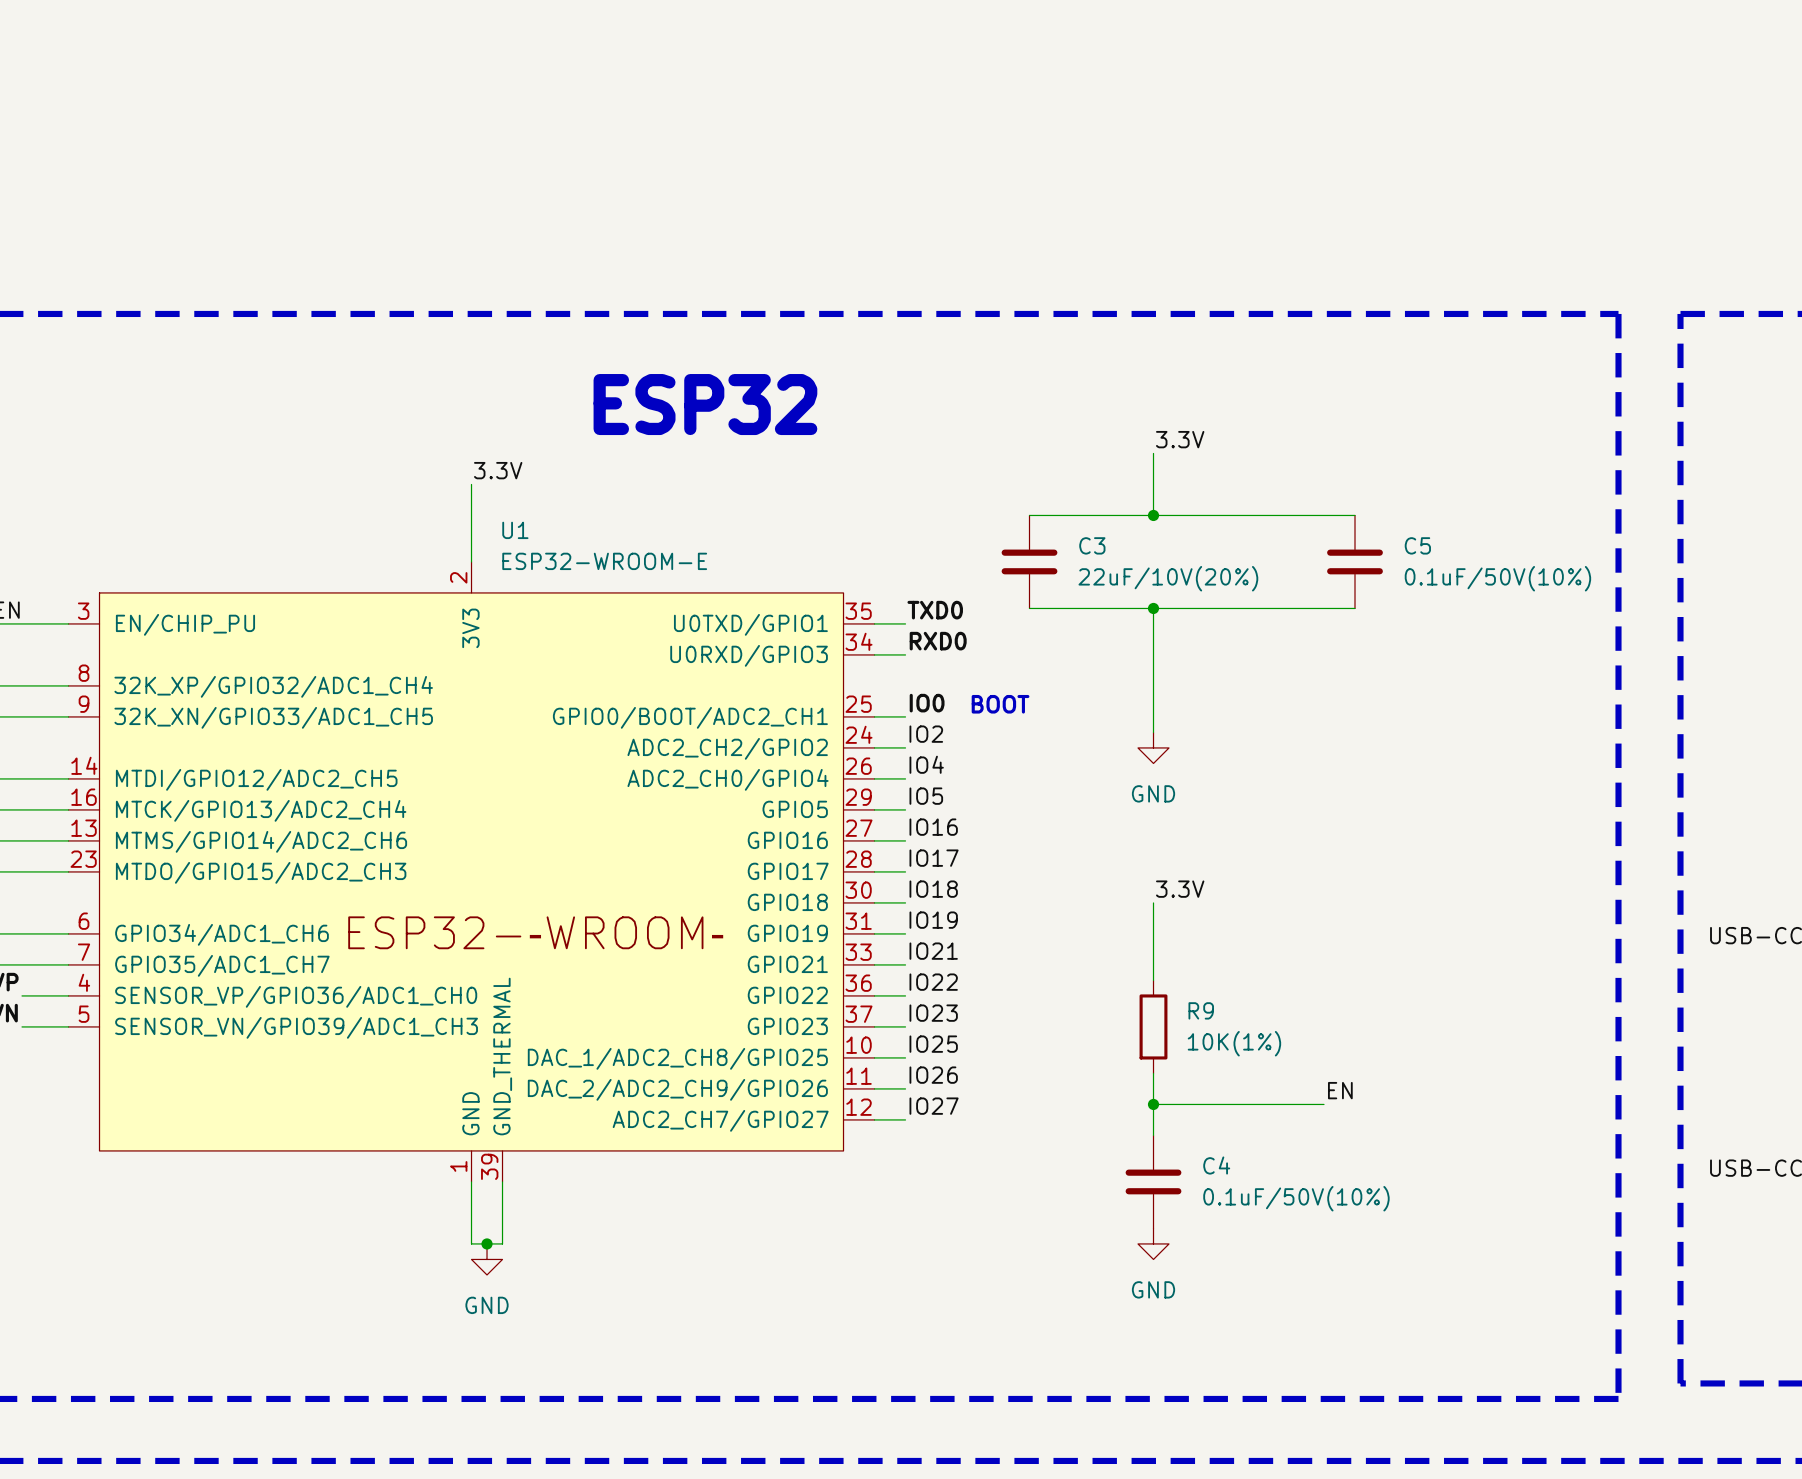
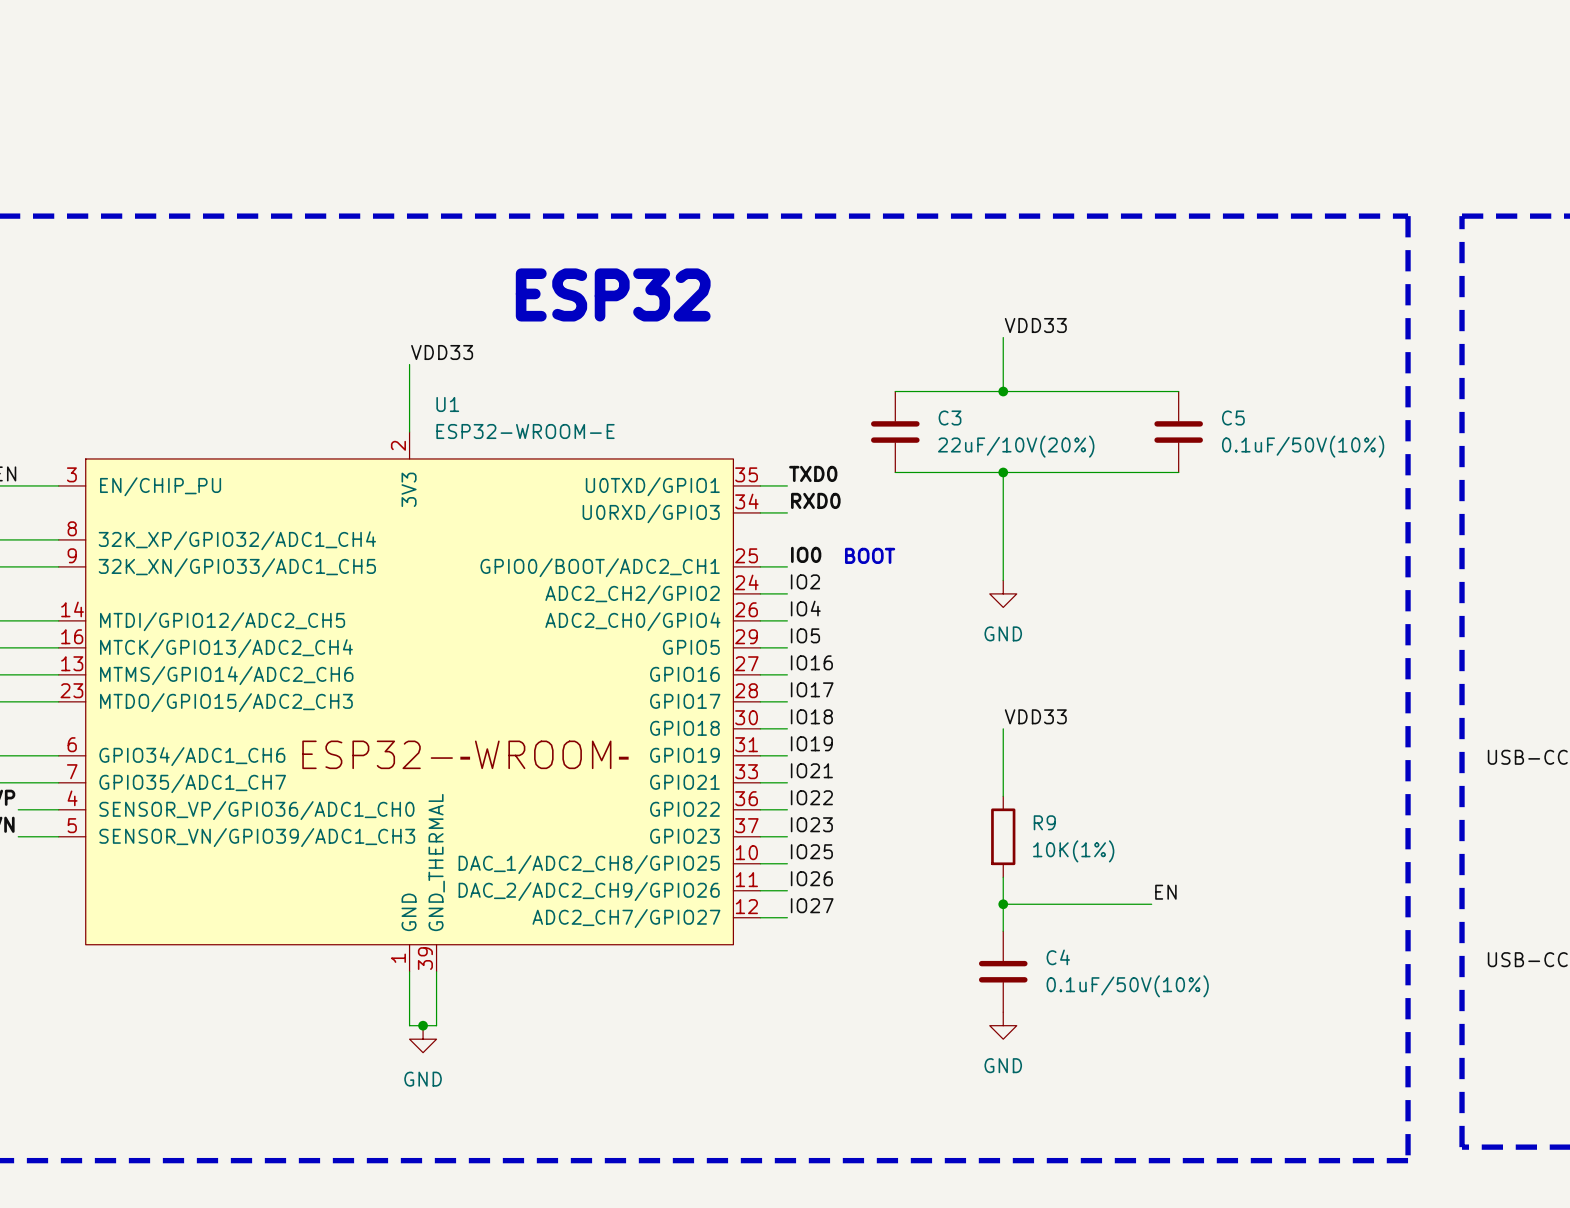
label: 3.3V (1180, 439) -> VDD33 (1035, 325)
label: 3.3V (498, 470) -> VDD33 (442, 352)
label: 3.3V (1180, 889) -> VDD33 (1035, 716)

